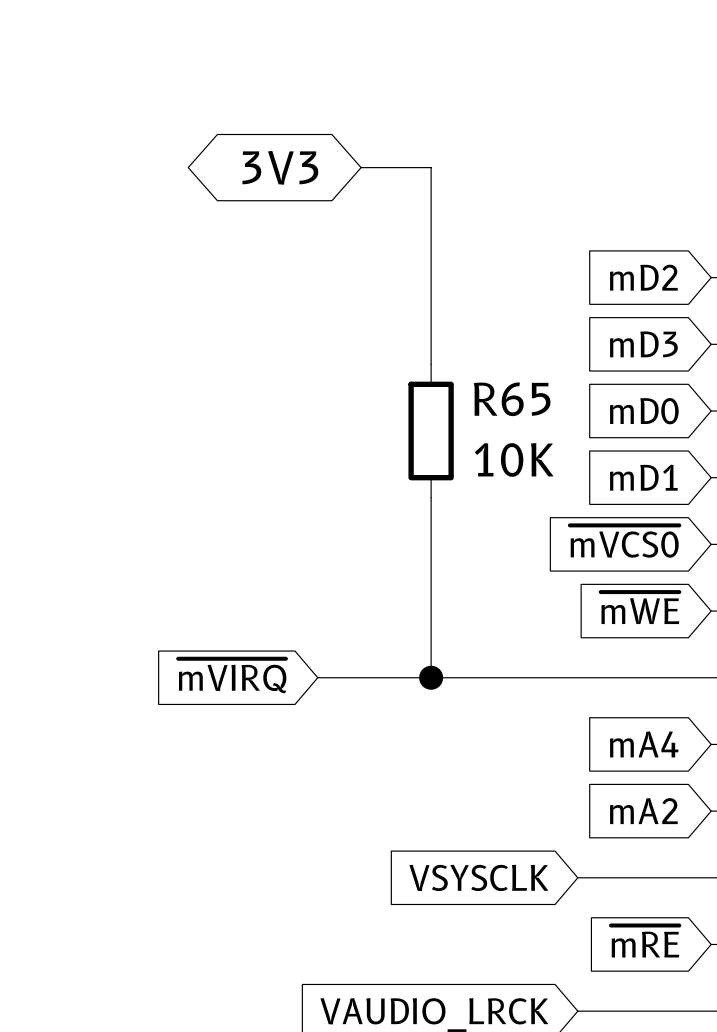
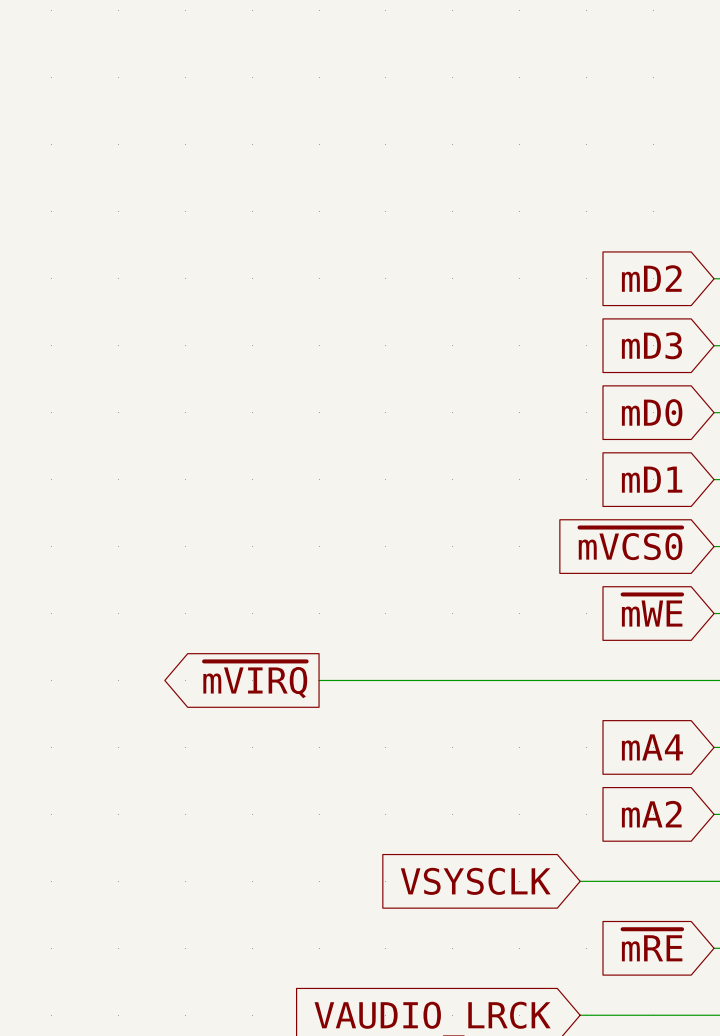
global label: 3V3 (280, 167) -> none
wire: (361, 167) (431, 167) (431, 364) -> none
R65: 10K (431, 431) -> none
wire: (431, 497) (431, 677) -> none
global label shape: input (232, 675) -> output (255, 679)
junction: (431, 677) -> none

